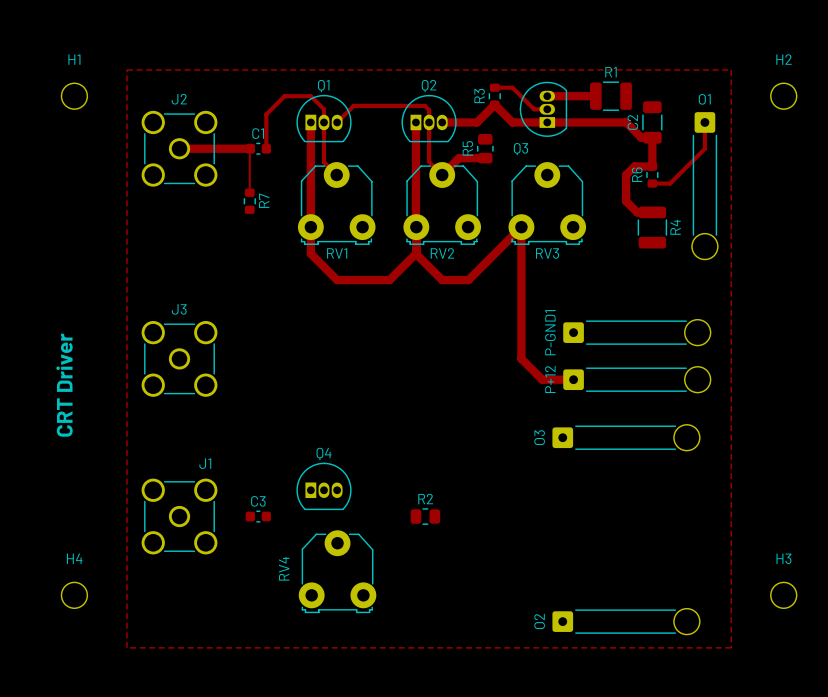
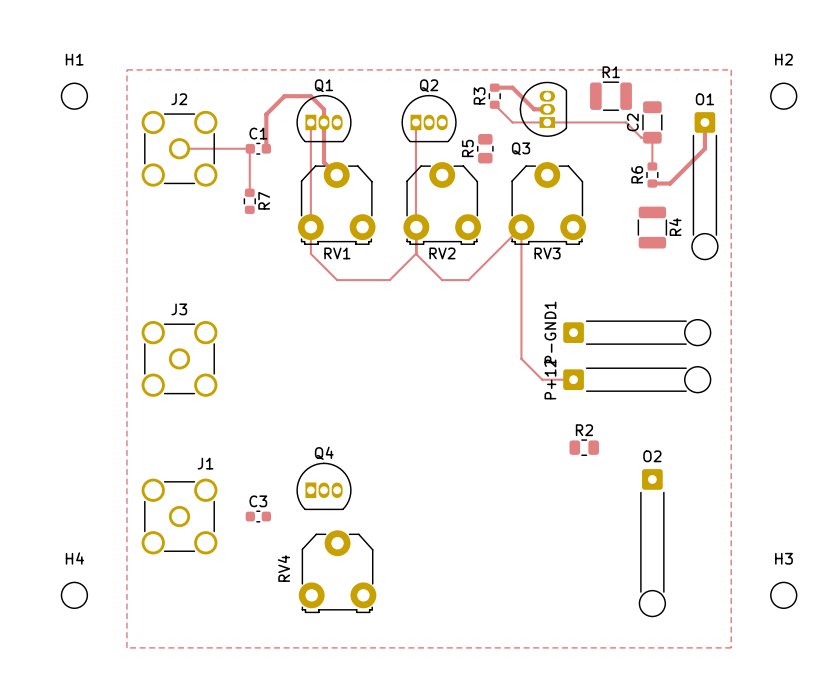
track: (547, 96) (595, 96) -> none
track: (494, 104) (477, 122) (442, 122) -> none
track width: thick (494, 104) (512, 122) (626, 122) (641, 137) (652, 137) (652, 166) -> thin (494, 104) (512, 122) (626, 122) (641, 137) (652, 137) (652, 166)
track width: thick (310, 122) (310, 253) (337, 280) (389, 280) (416, 253) -> thin (310, 122) (310, 253) (337, 280) (389, 280) (416, 253)
track: (337, 122) (353, 105) (424, 105) (429, 110) (429, 161) (442, 175) (459, 158) (485, 158) -> none
track width: thick (415, 122) (416, 254) (442, 280) (468, 280) (521, 227) (521, 358) (542, 379) (573, 379) -> thin (415, 122) (416, 254) (442, 280) (468, 280) (521, 227) (521, 358) (542, 379) (573, 379)
track width: thick (179, 148) (250, 148) -> thin (179, 148) (250, 148)
track: (652, 166) (634, 166) (626, 175) (626, 201) (637, 212) (652, 212) -> none
text: CRT Driver (64, 385) -> none
O3: (626, 437) -> none
R2 position: (425, 516) -> (584, 447)
O2 rotation: 0° (626, 621) -> 90° clockwise (652, 542)

